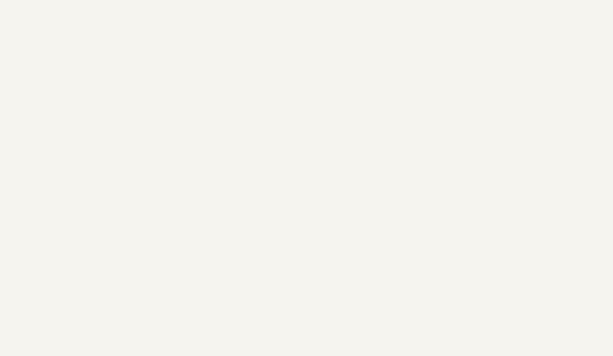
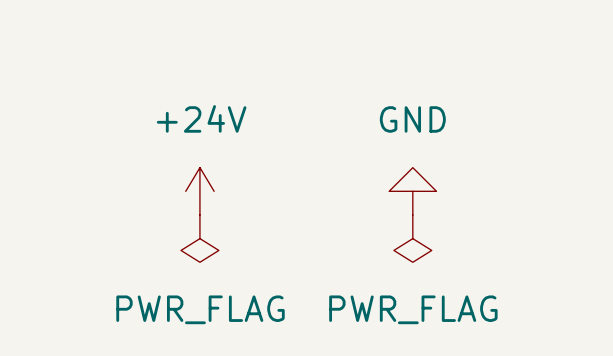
power symbol: none -> +24V (199, 191)
power symbol: none -> GND (412, 191)
power symbol: none -> PWR_FLAG (199, 238)
power symbol: none -> PWR_FLAG (412, 238)

